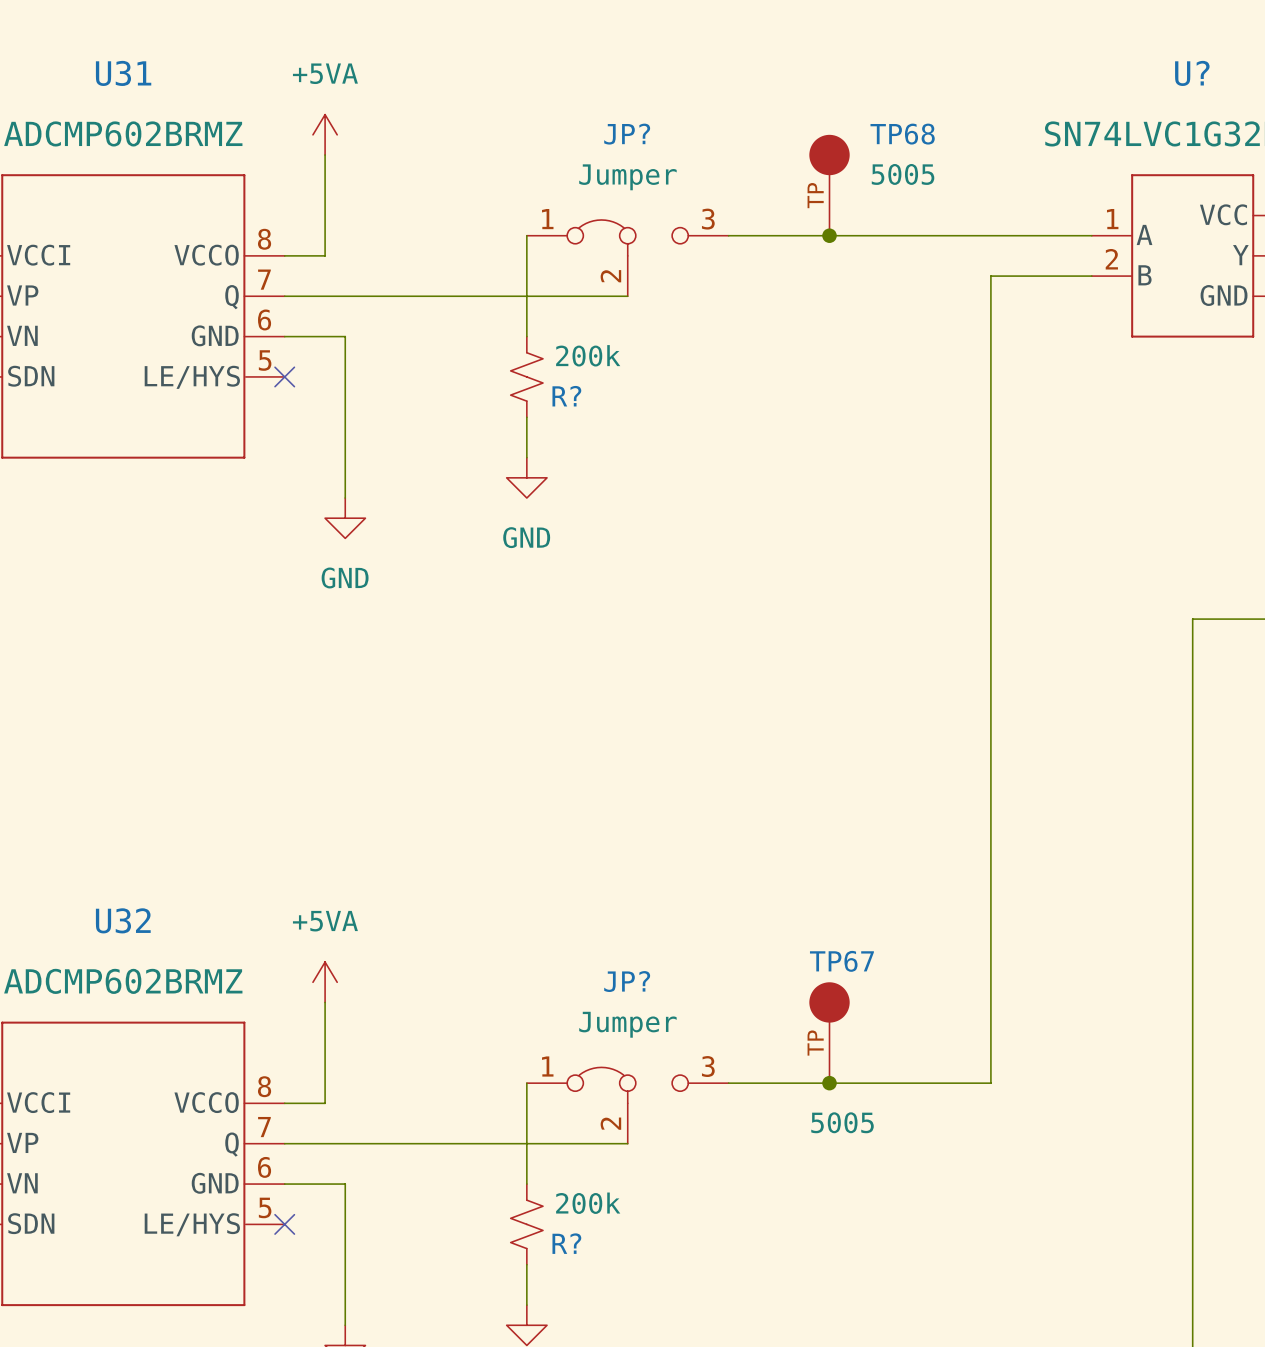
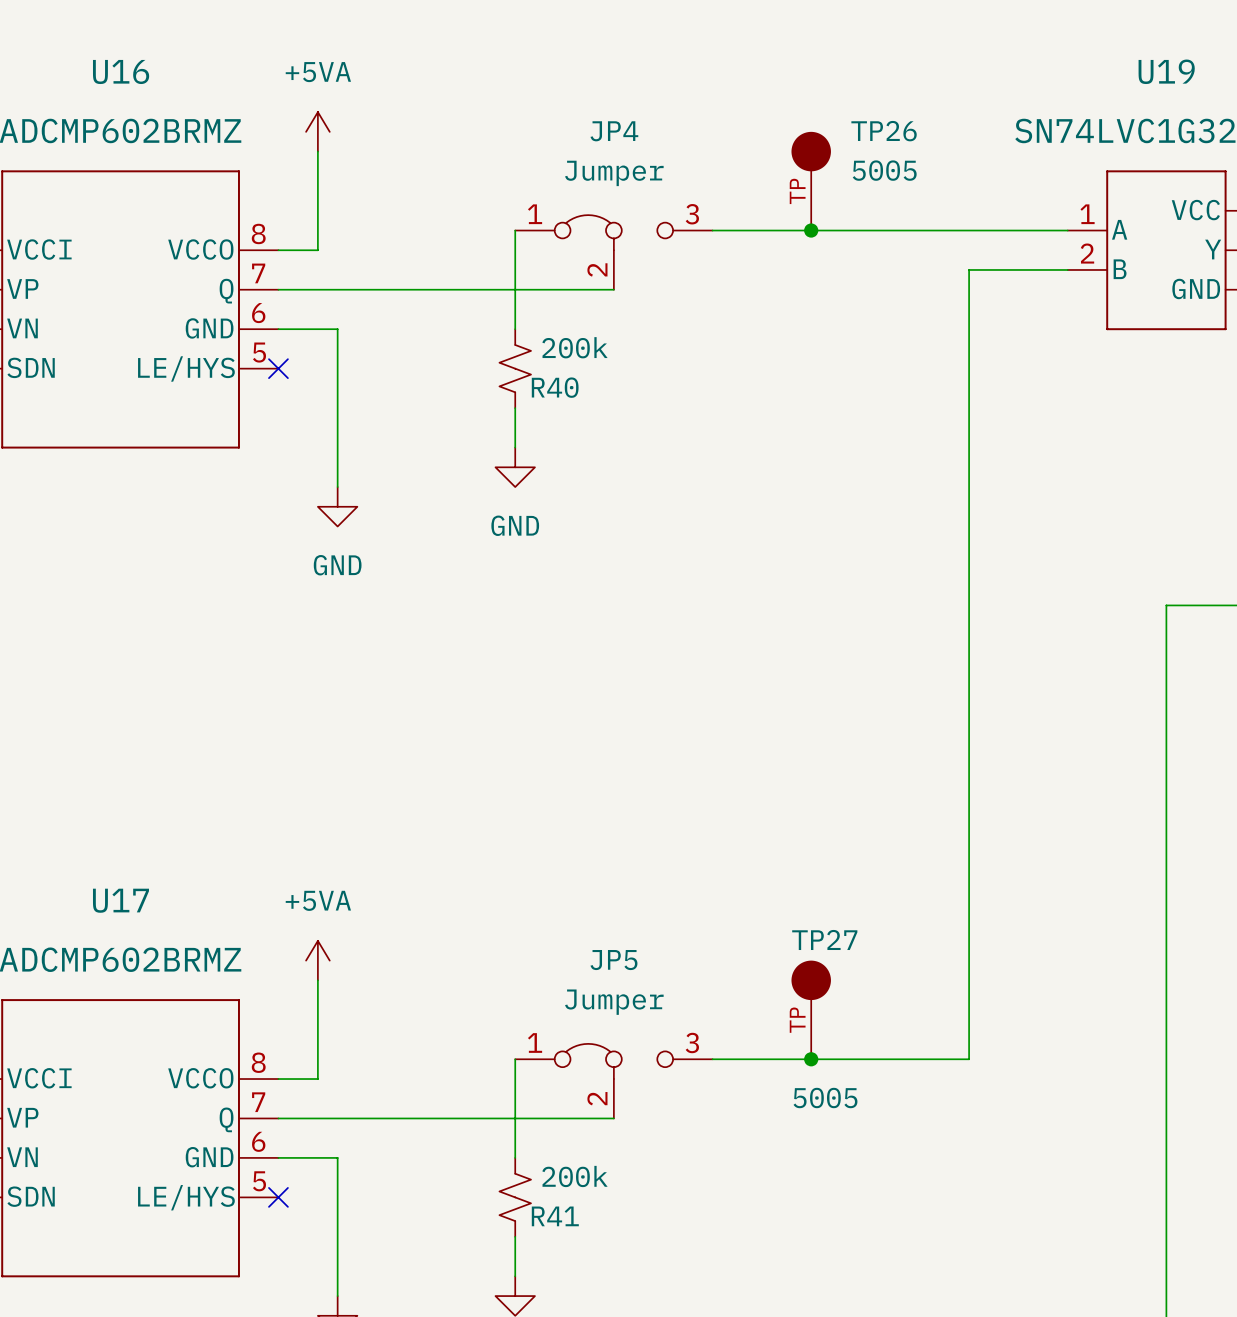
U31 name: U31 (123, 73) -> U16 (121, 71)
U? name: U? (1192, 73) -> U19 (1166, 71)
JP? name: JP? (627, 134) -> JP4 (614, 131)
TP68 name: TP68 (902, 134) -> TP26 (884, 131)
R? name: R? (566, 396) -> R40 (555, 387)
U32 name: U32 (123, 920) -> U17 (120, 900)
TP67 name: TP67 (841, 961) -> TP27 (824, 939)
JP? name: JP? (627, 981) -> JP5 (613, 960)
R? name: R? (566, 1243) -> R41 (555, 1216)

